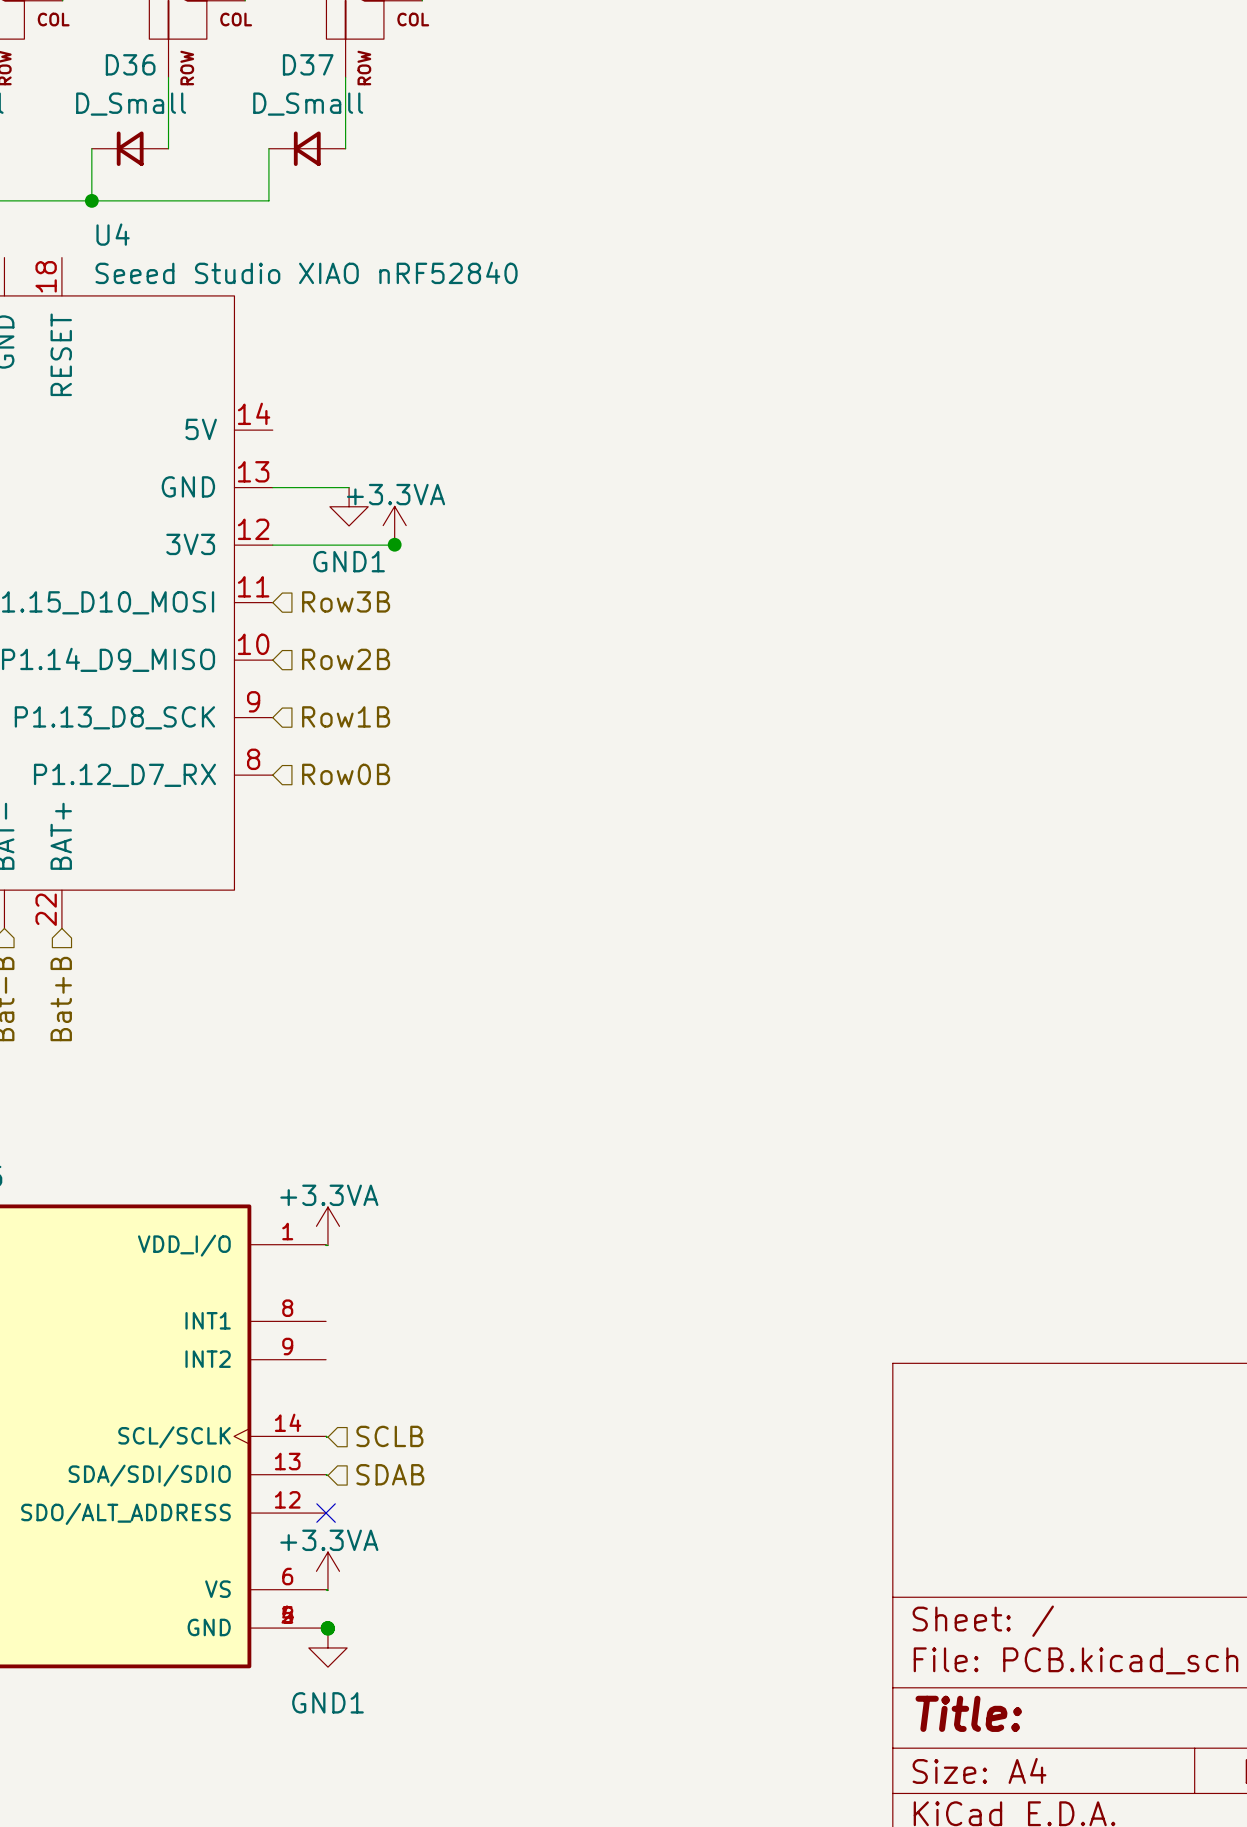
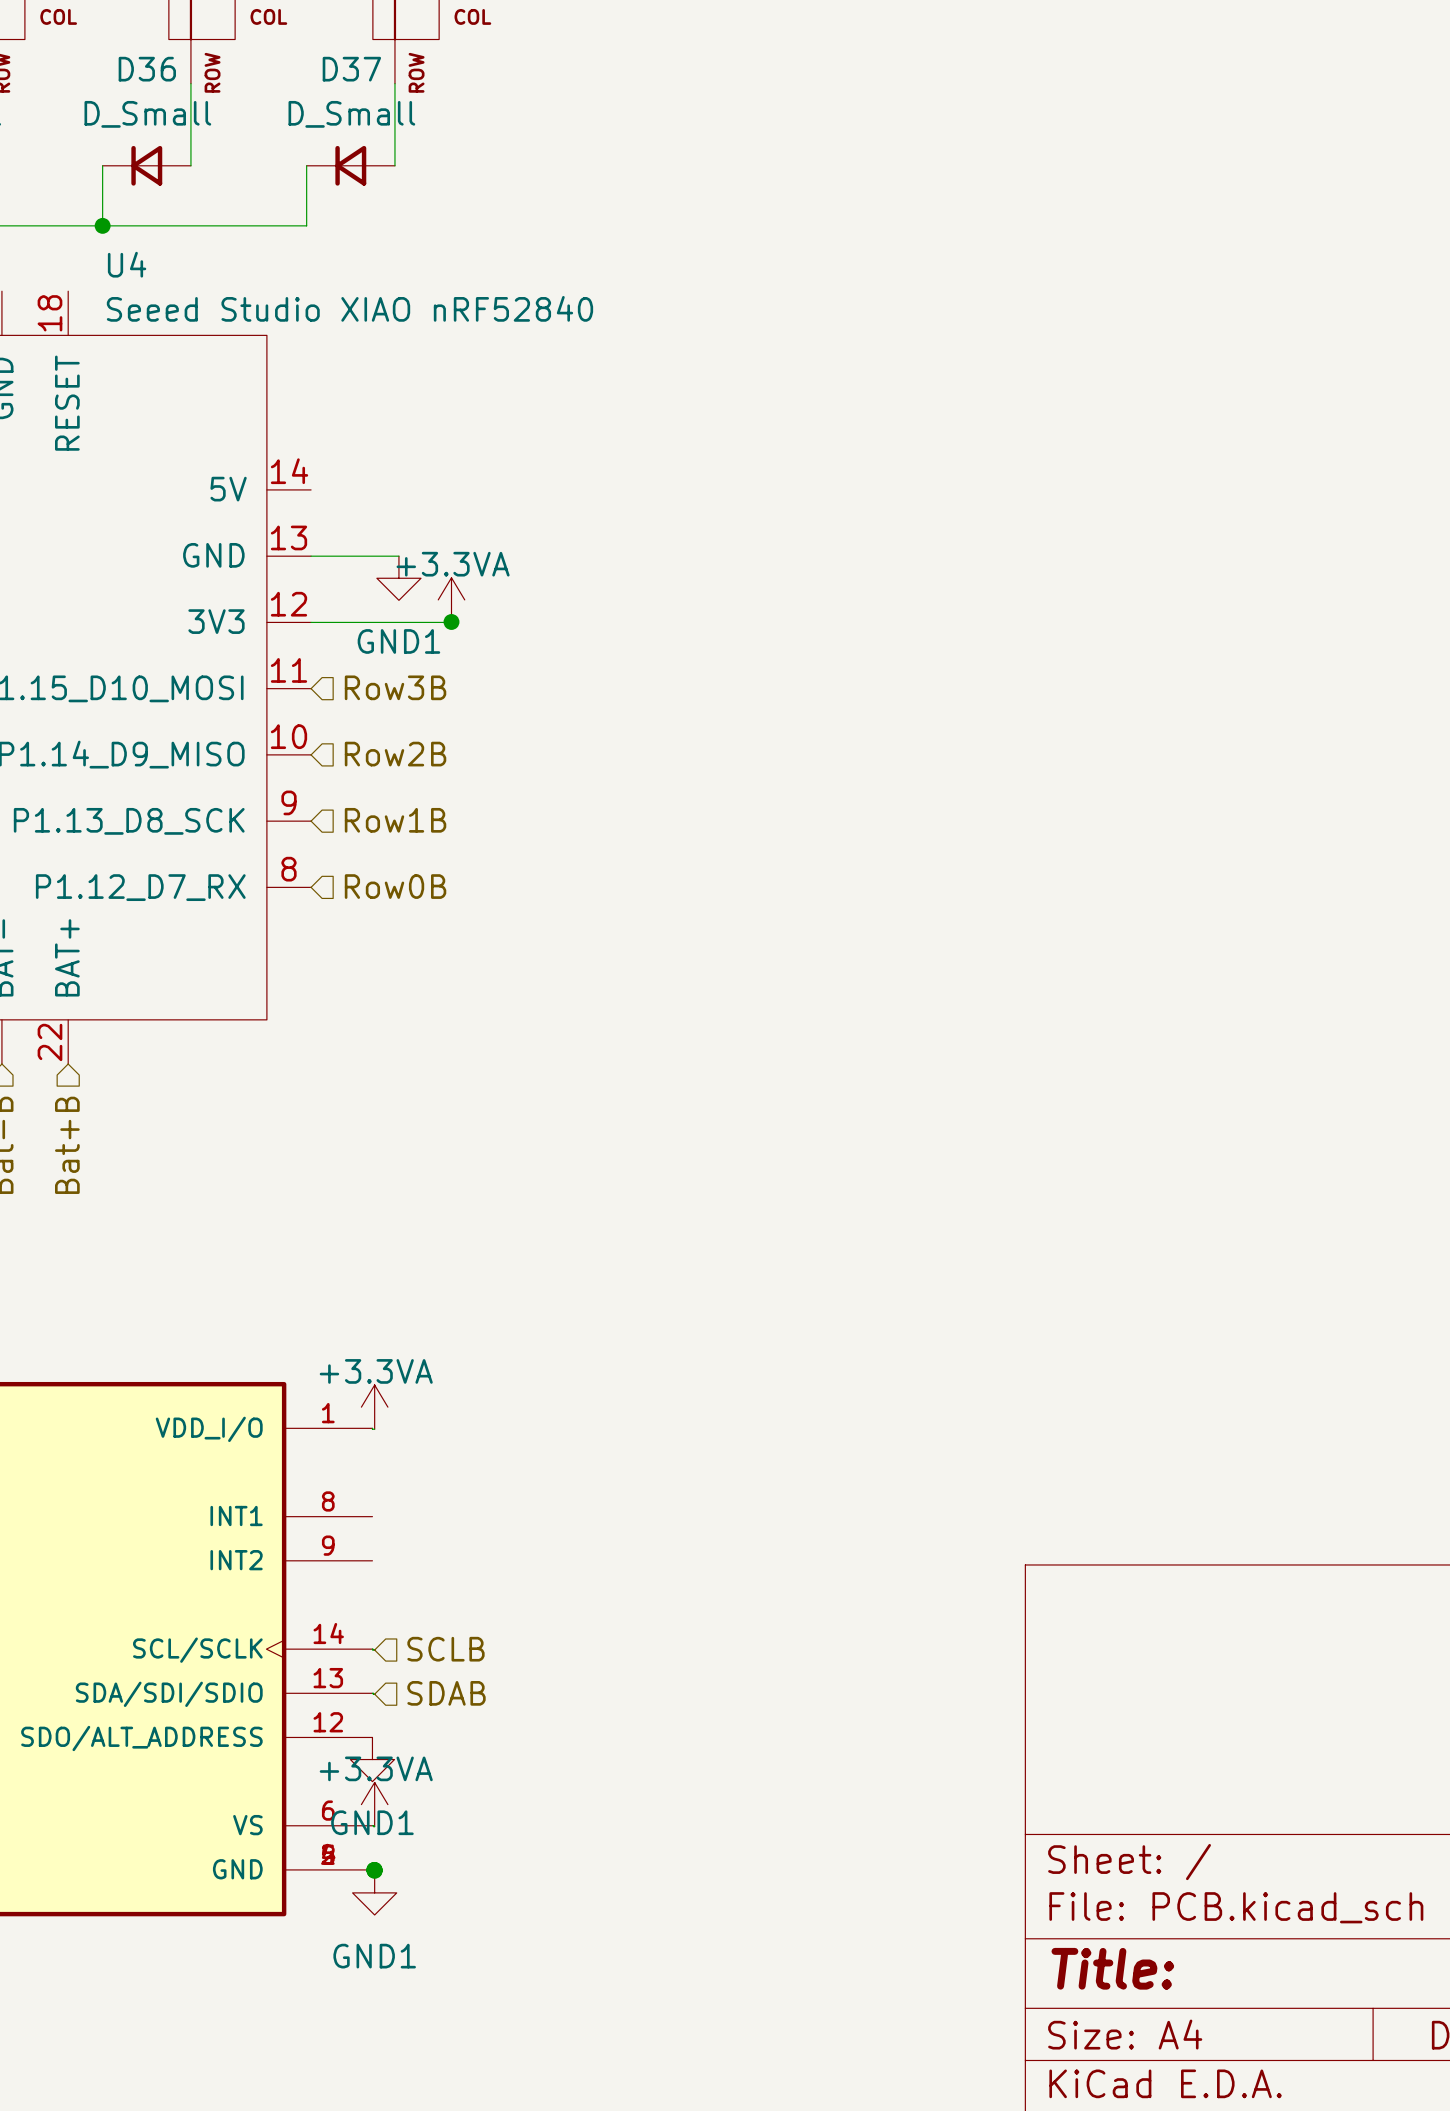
no-connect mark: (326, 1513) -> none
power symbol: none -> GND1 (372, 1759)

